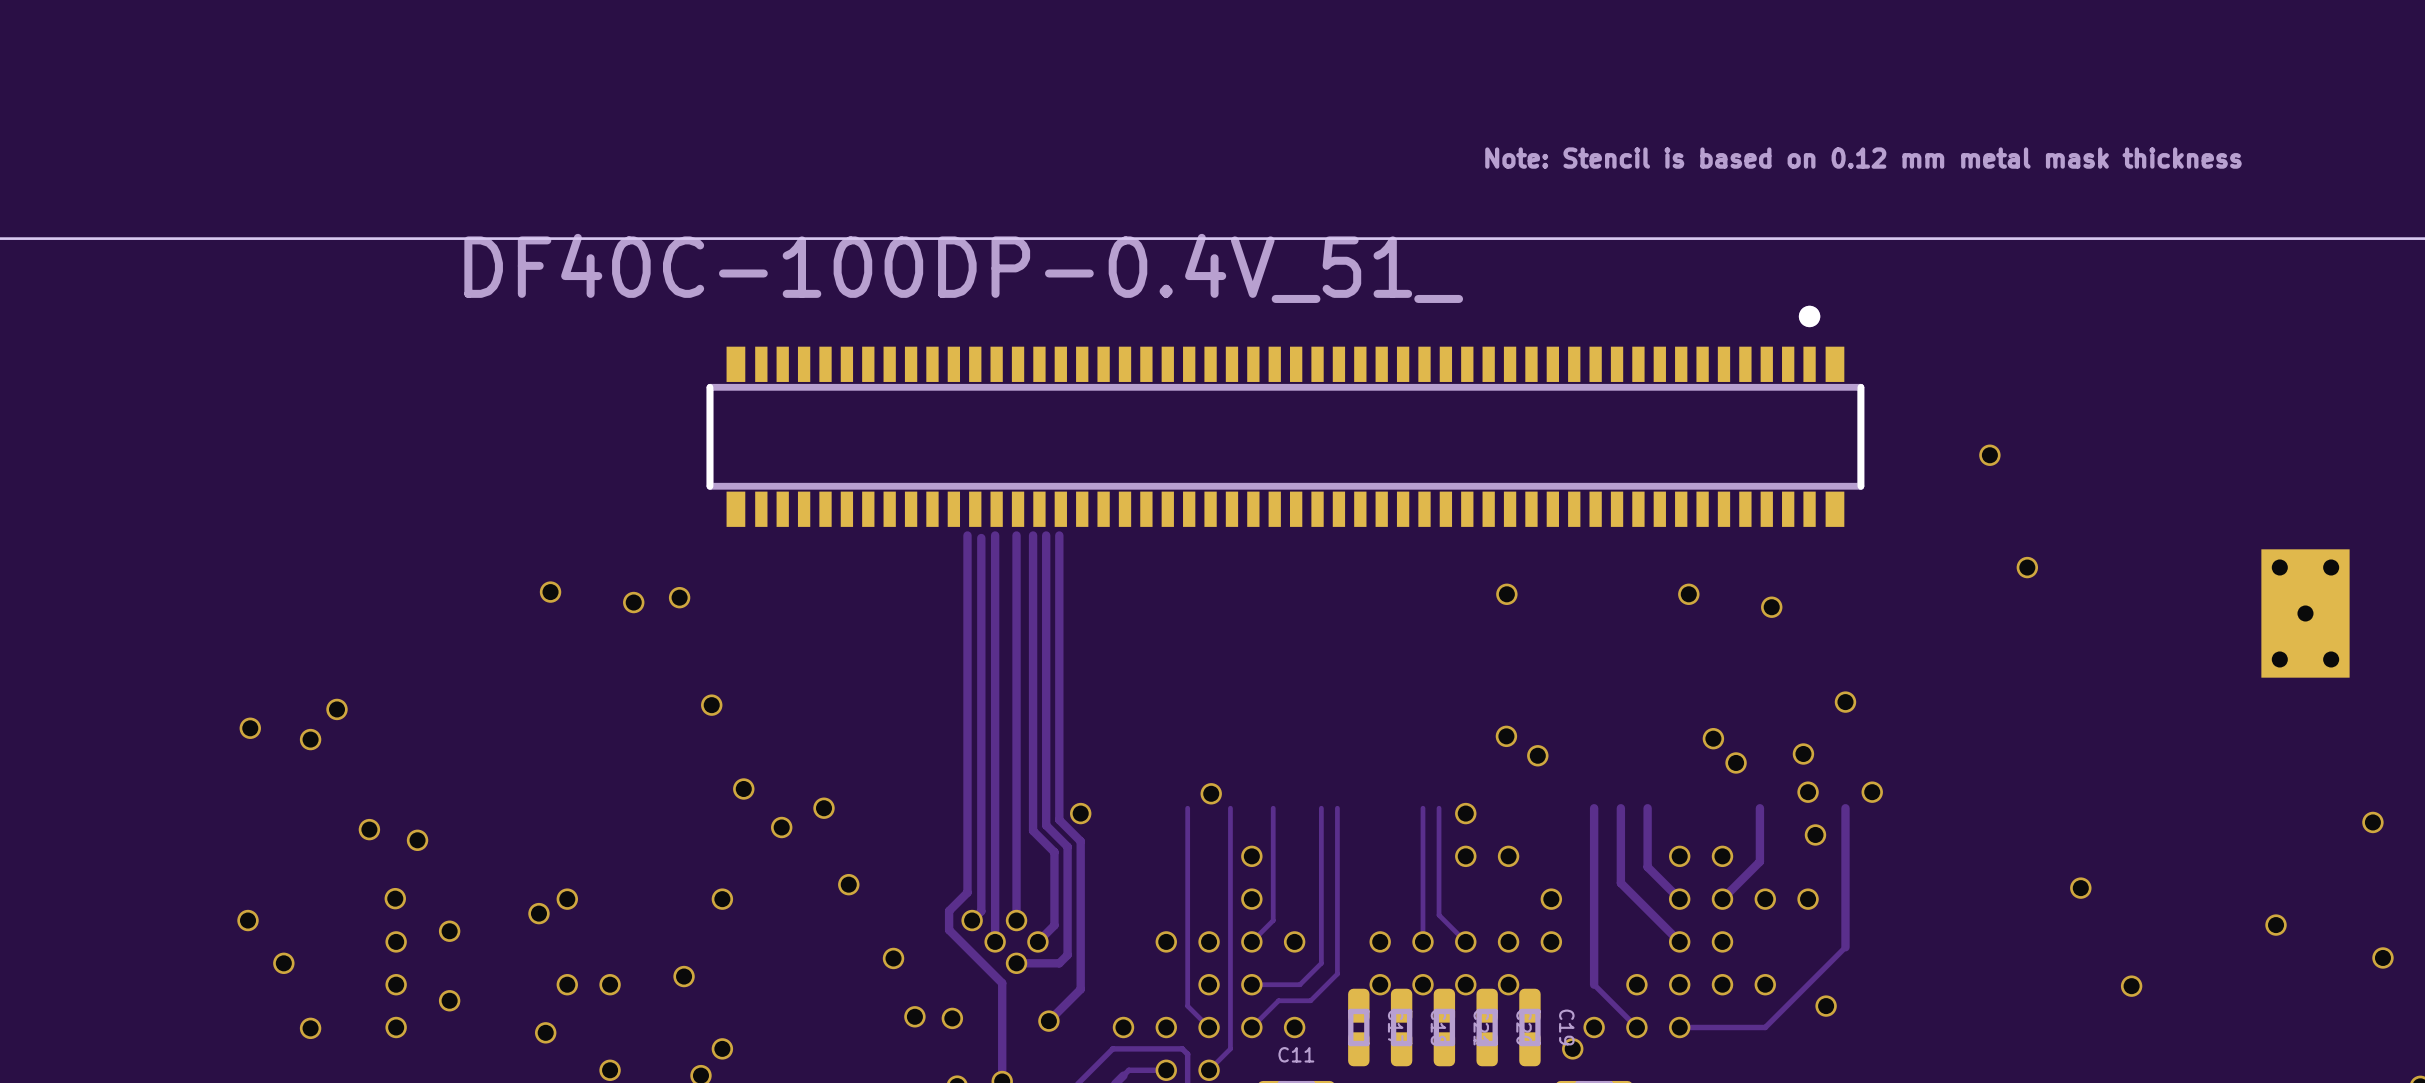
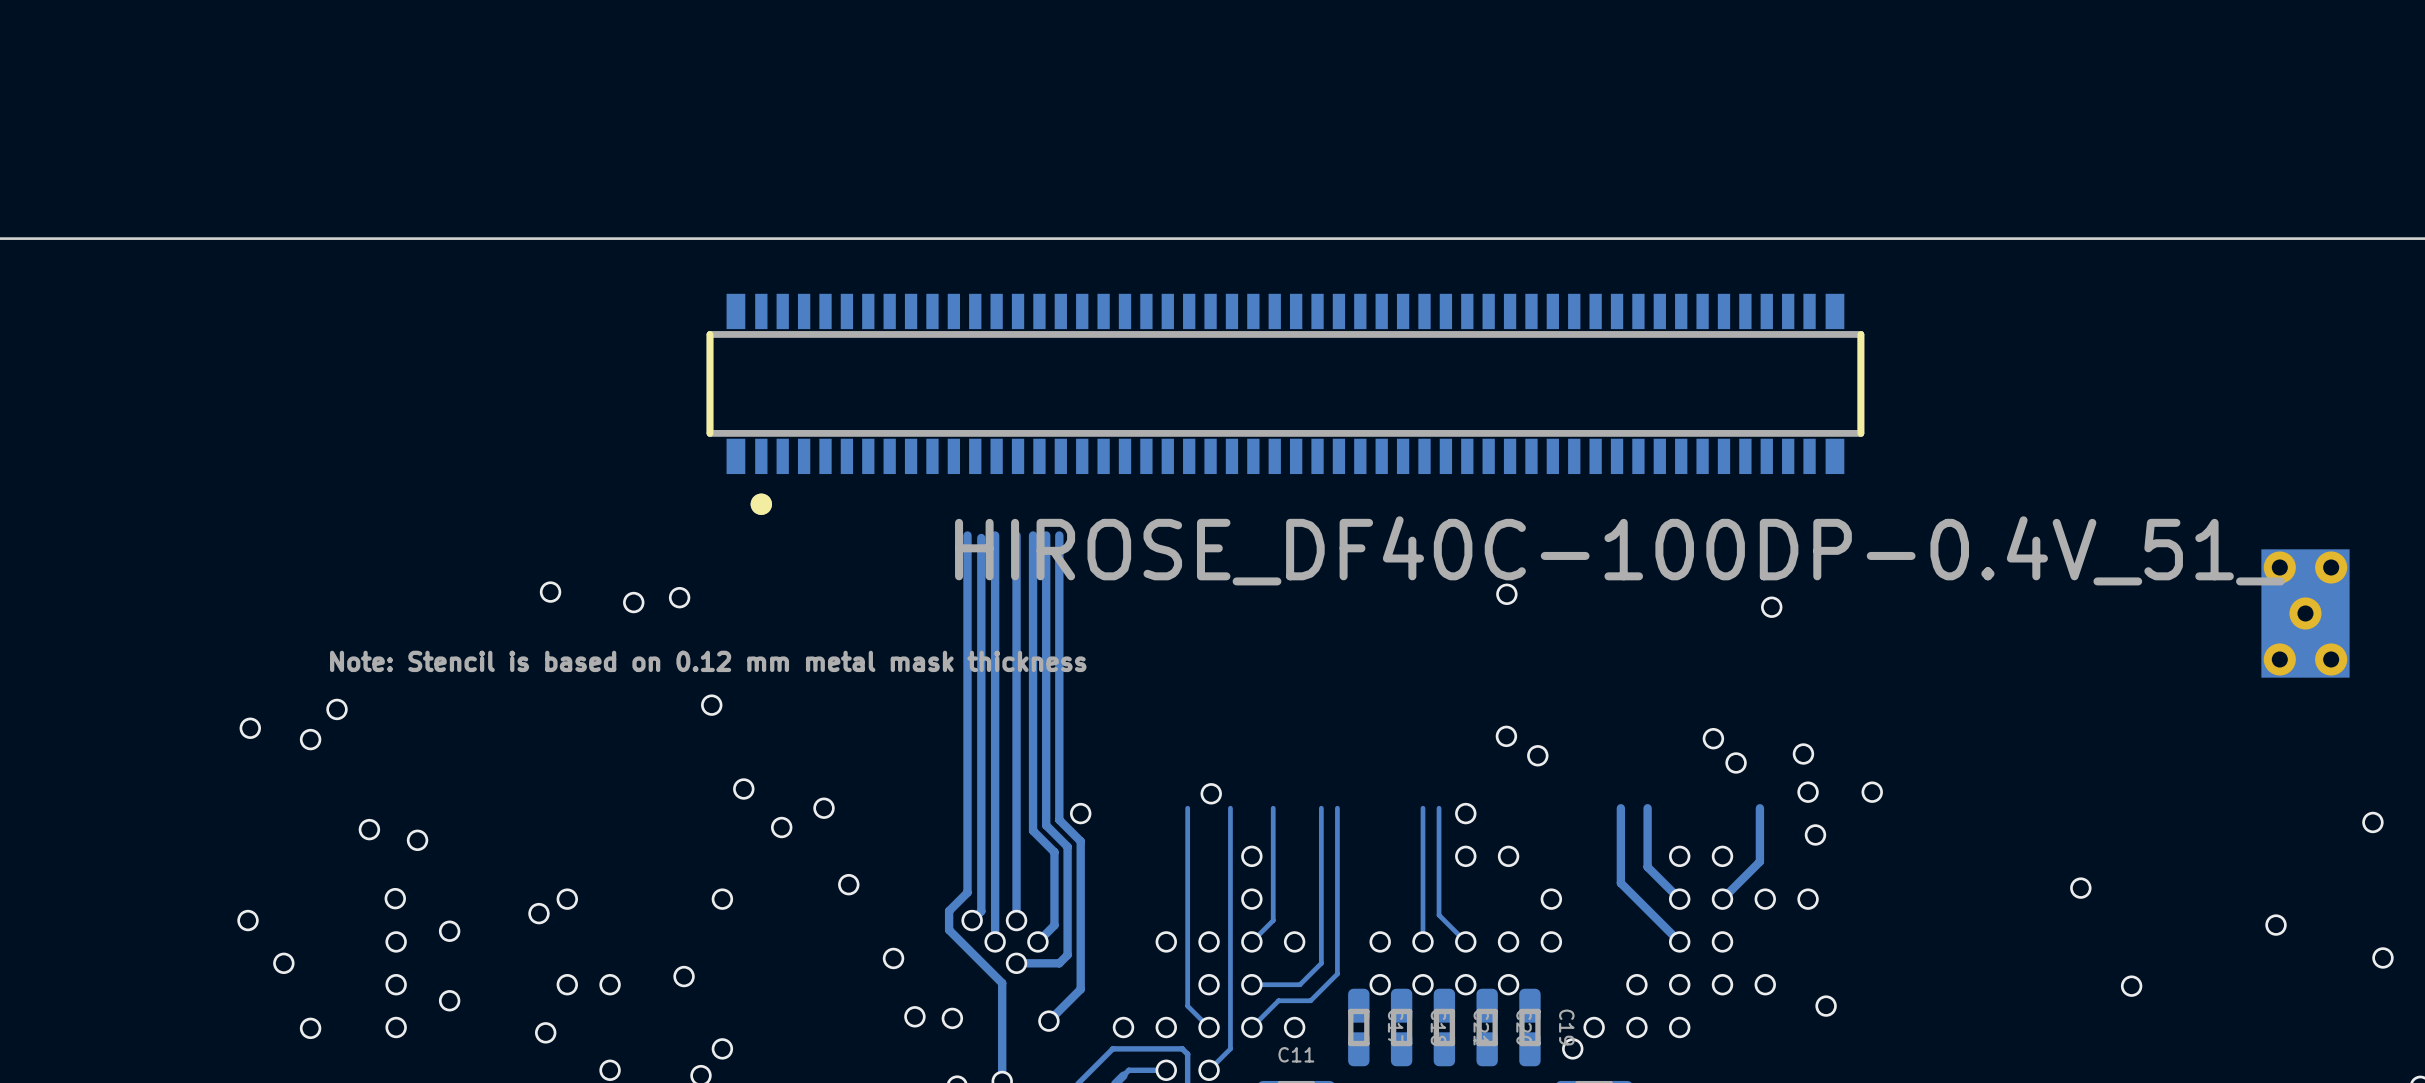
part value: DF40C-100DP-0.4V_51_ (963, 268) -> HIROSE_DF40C-100DP-0.4V_51_ (1619, 550)
part rotation: 0° (1285, 416) -> 180° (1285, 404)
via: (1989, 455) -> none
via: (2027, 567) -> none
via: (1688, 594) -> none
via: (1845, 702) -> none
track: (1594, 808) (1594, 984) (1636, 1027) -> none
track: (1845, 808) (1845, 947) (1765, 1027) (1679, 1027) -> none

